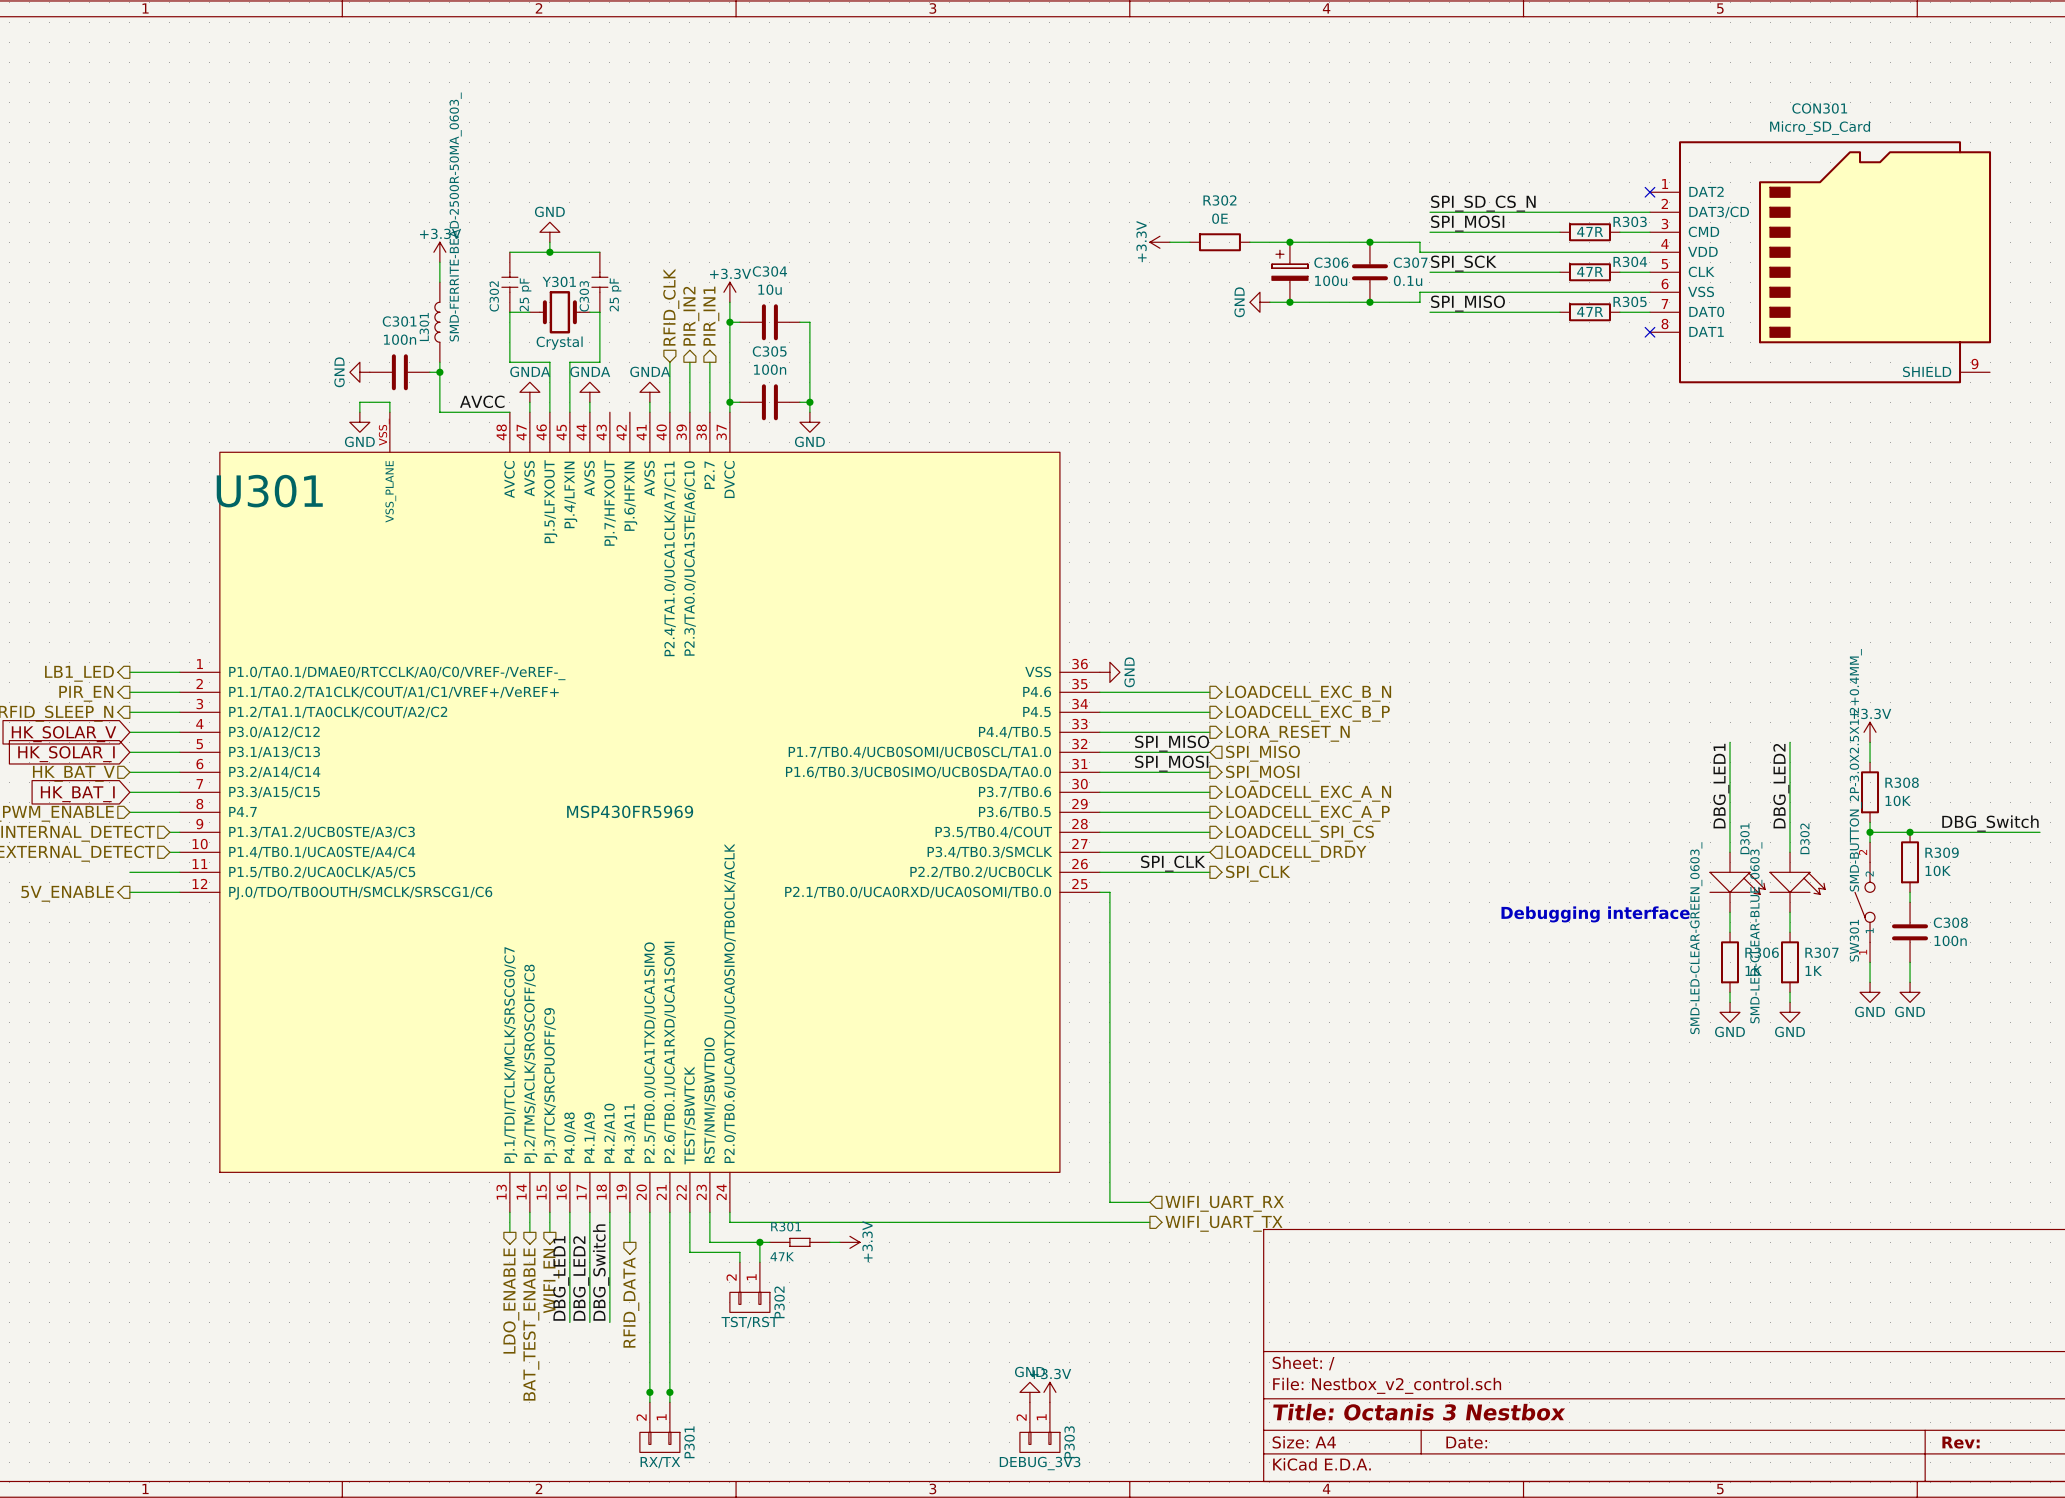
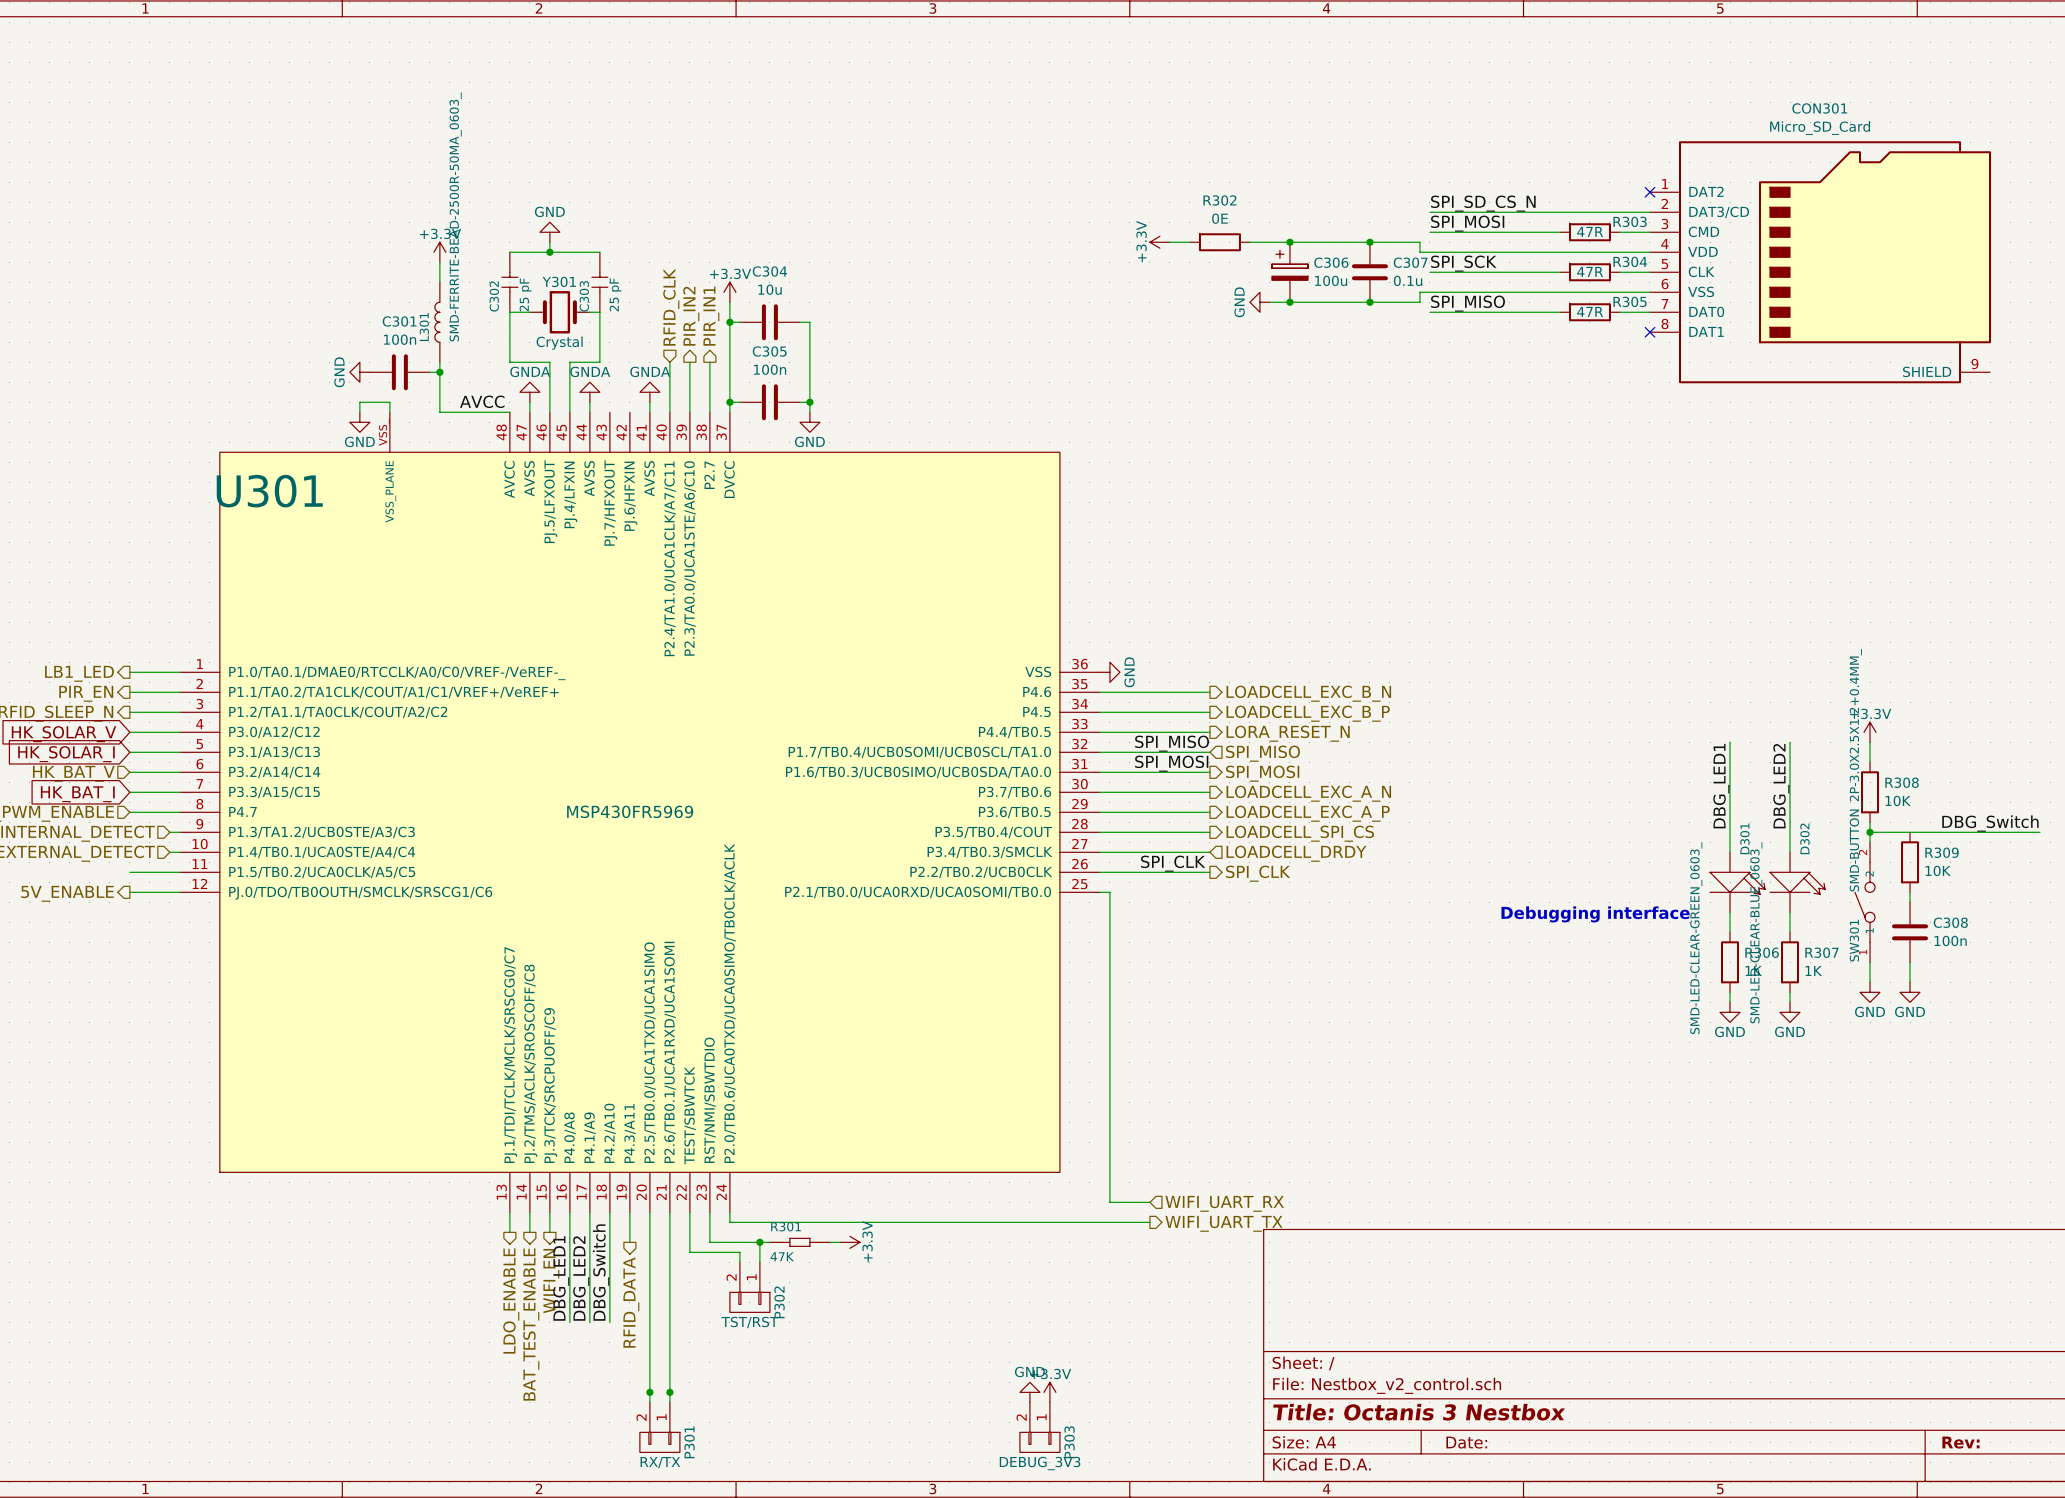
junction: (1910, 832) -> none

